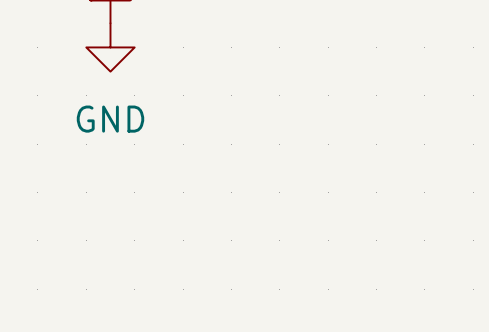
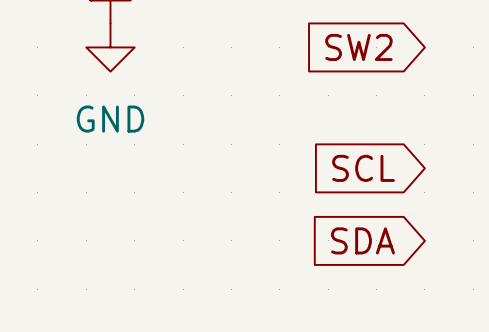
global label: none -> SW2 (358, 47)
global label: none -> SCL (363, 168)
global label: none -> SDA (362, 240)

